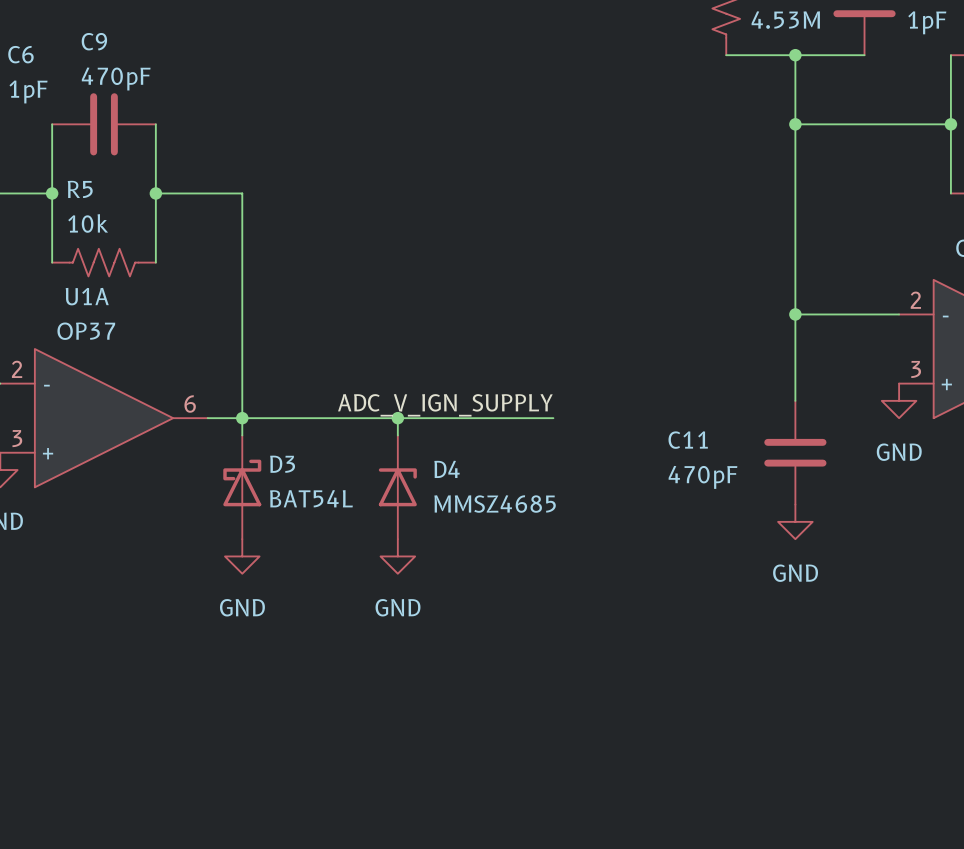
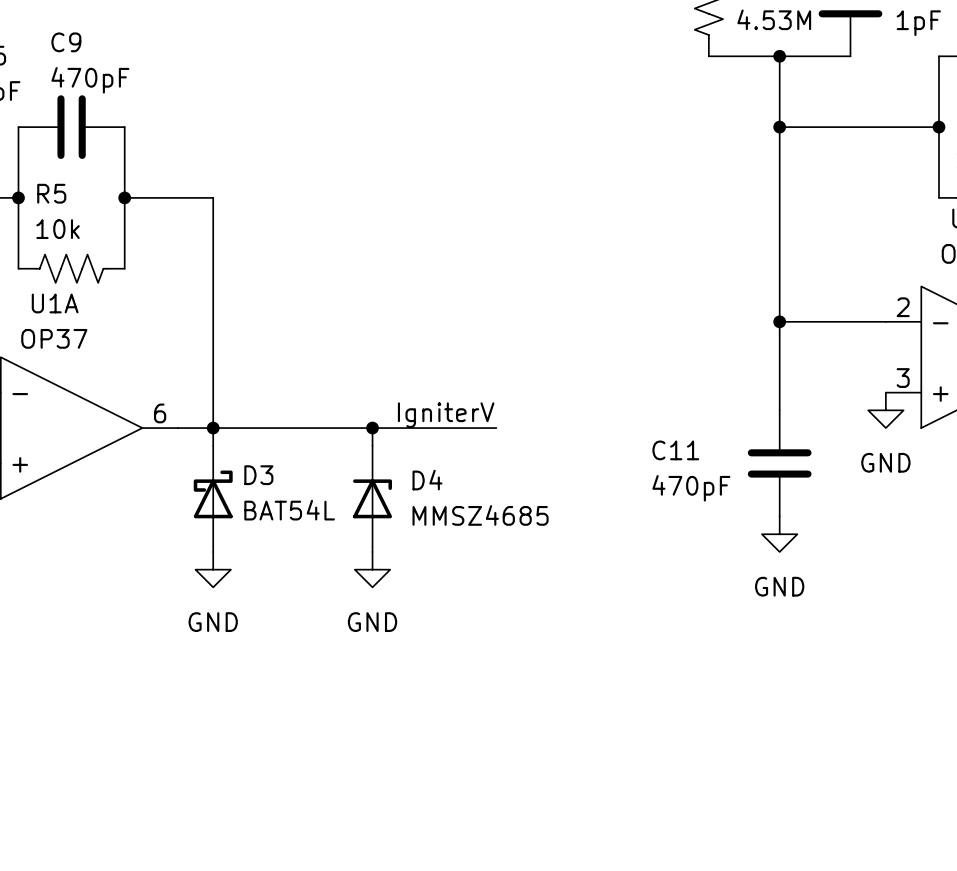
label: ADC_V_IGN_SUPPLY (445, 405) -> none
label: none -> IgniterV (446, 415)
wire: (518, 418) (553, 418) -> none

